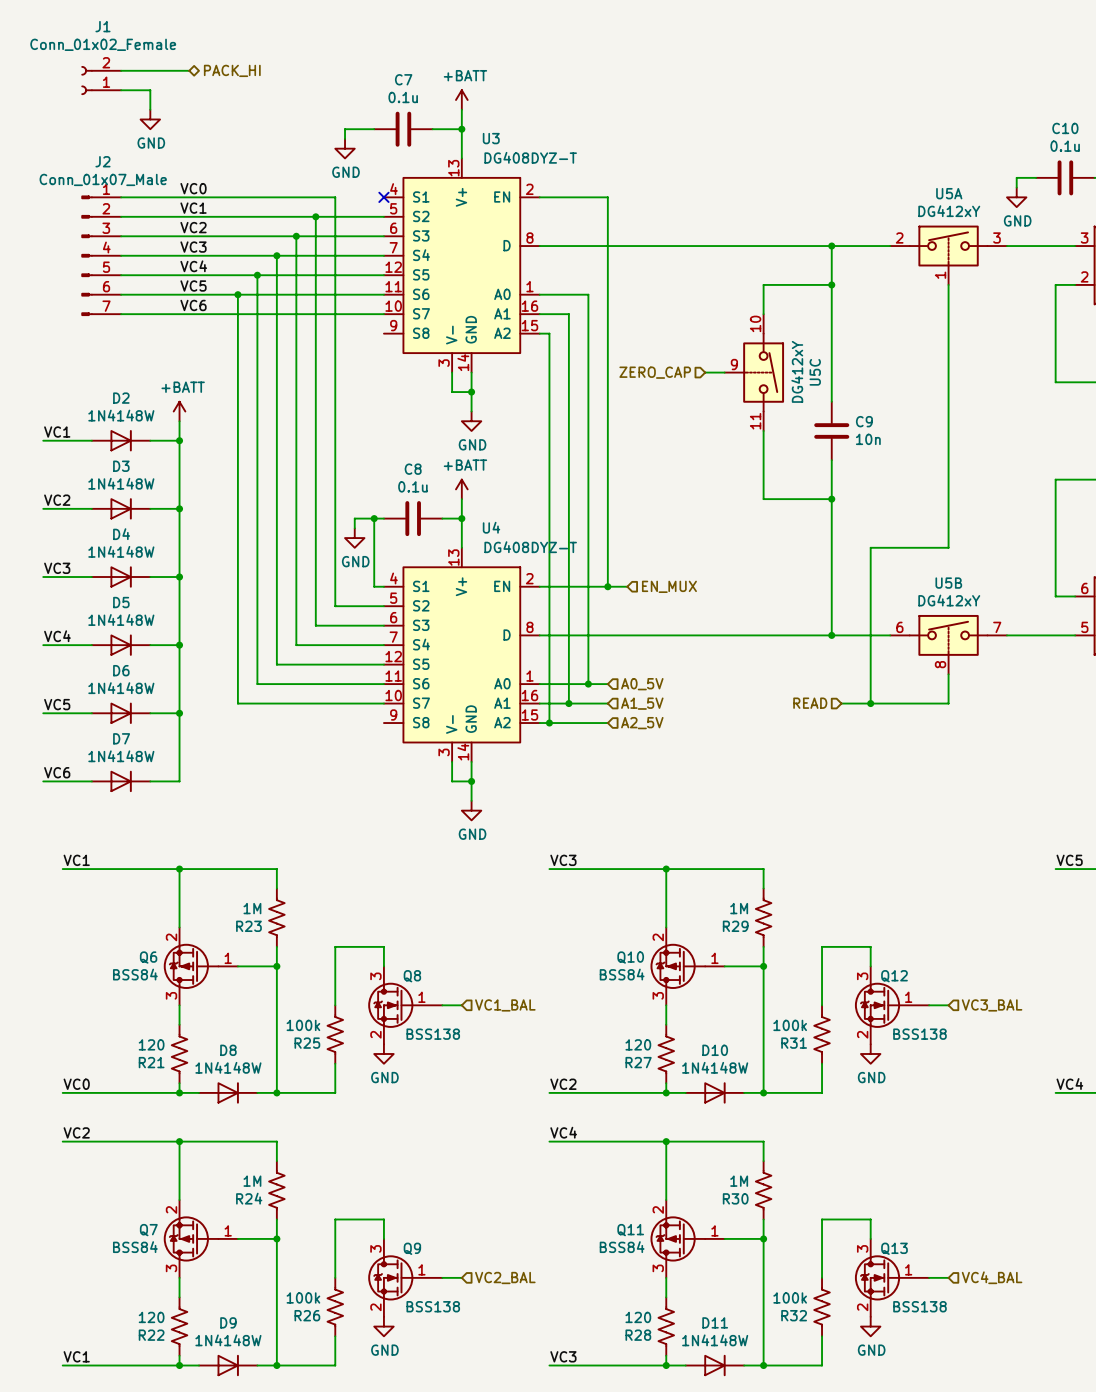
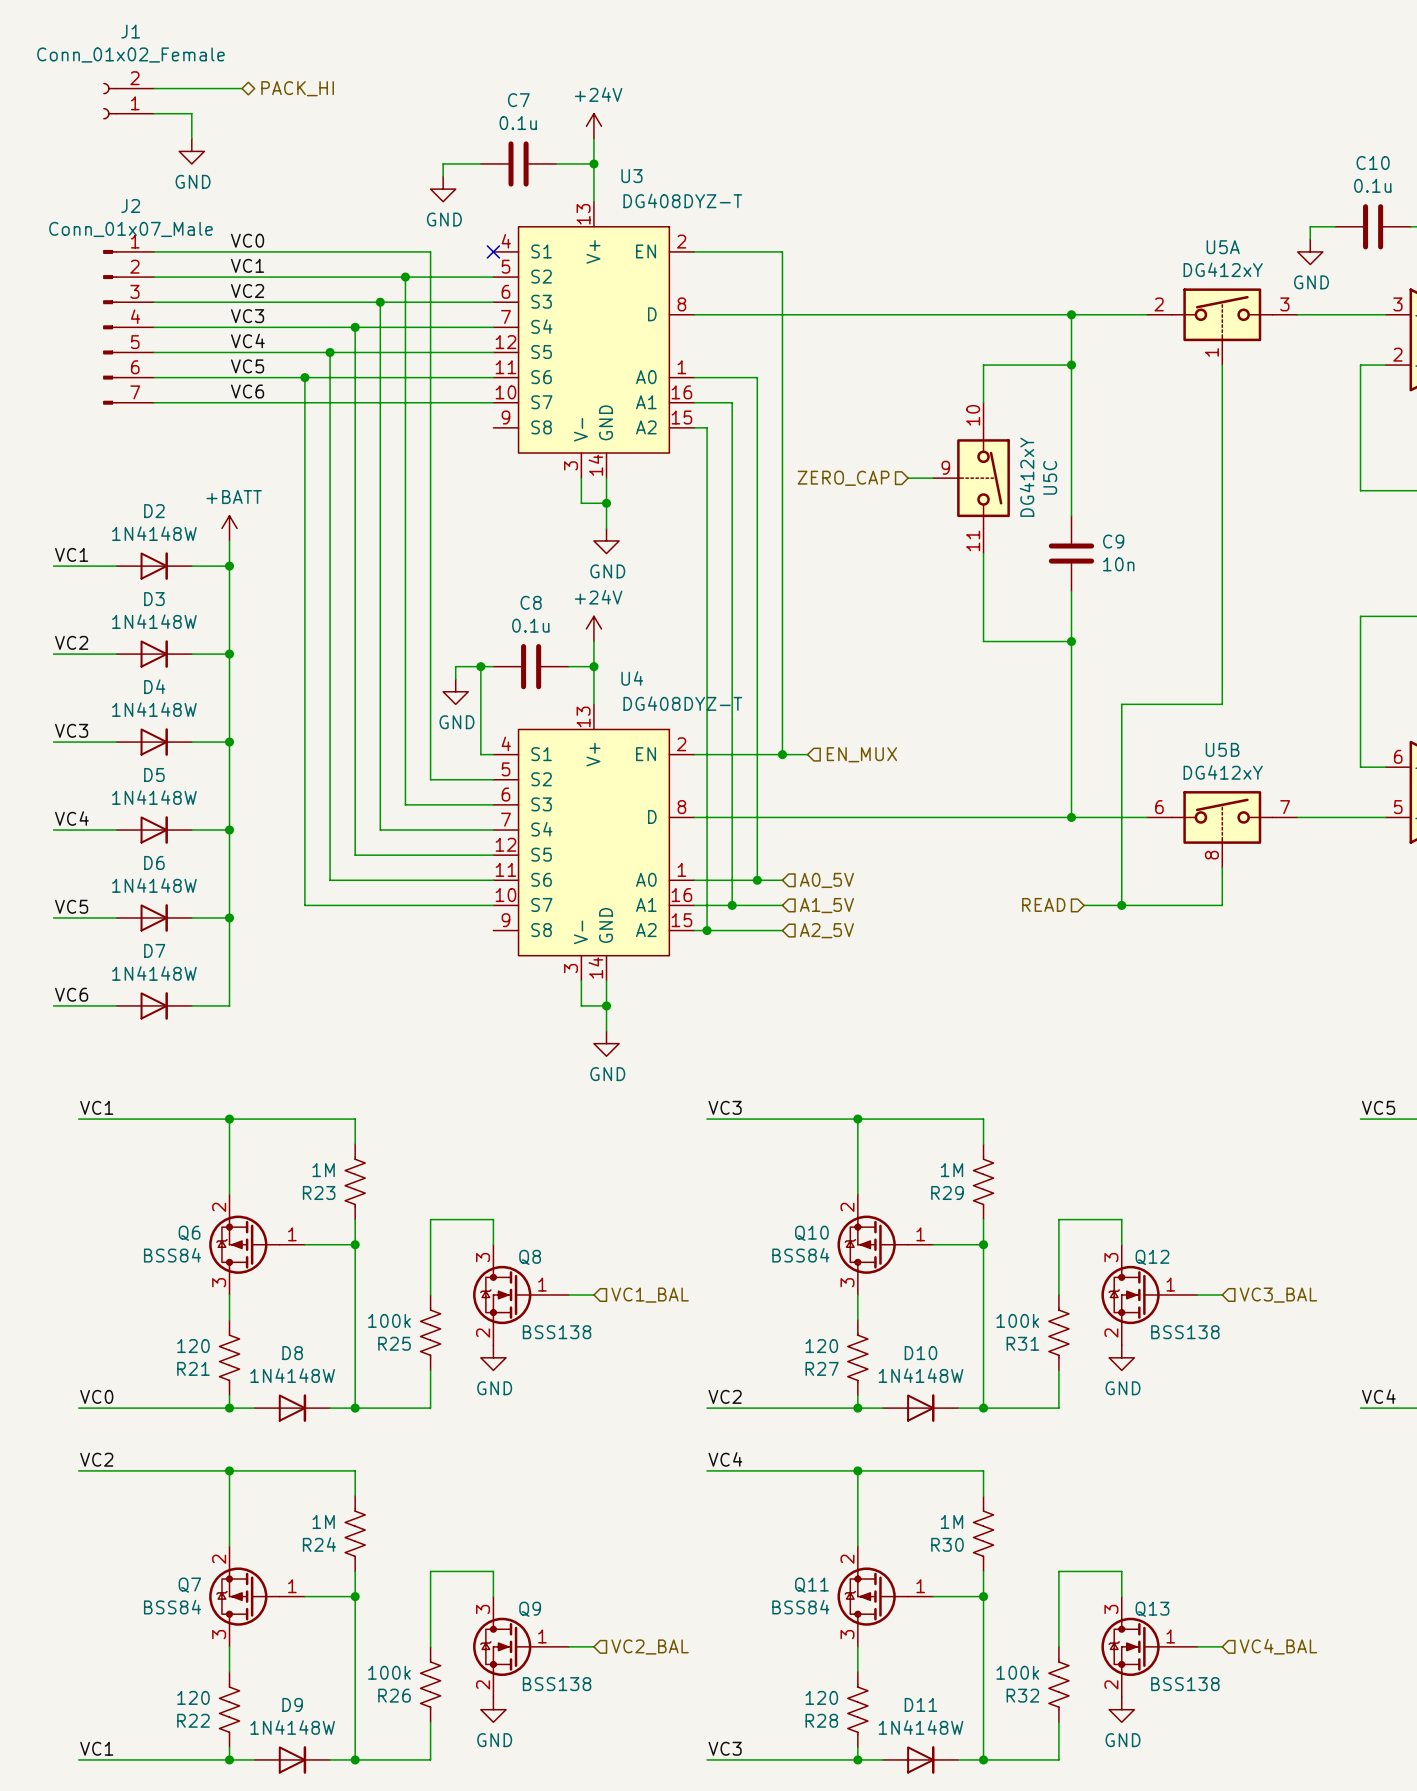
power symbol: +BATT (461, 100) -> +24V (593, 126)
power symbol: +BATT (461, 489) -> +24V (593, 628)

